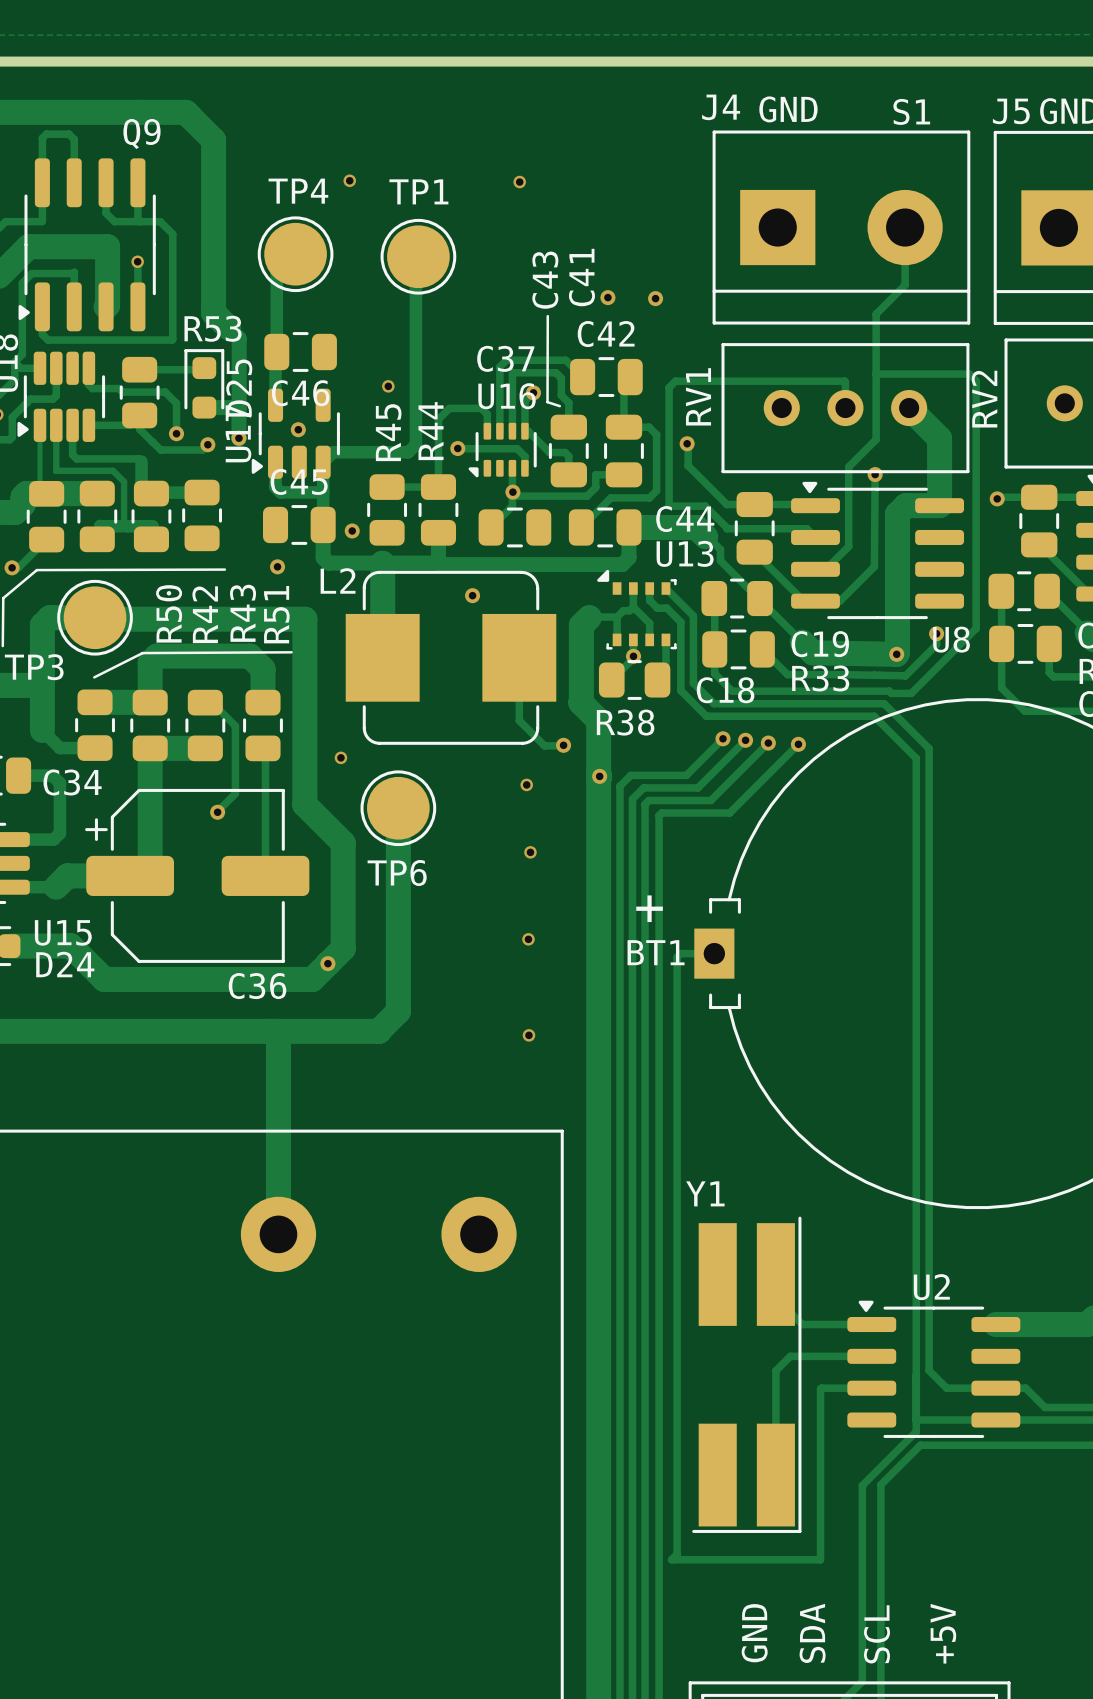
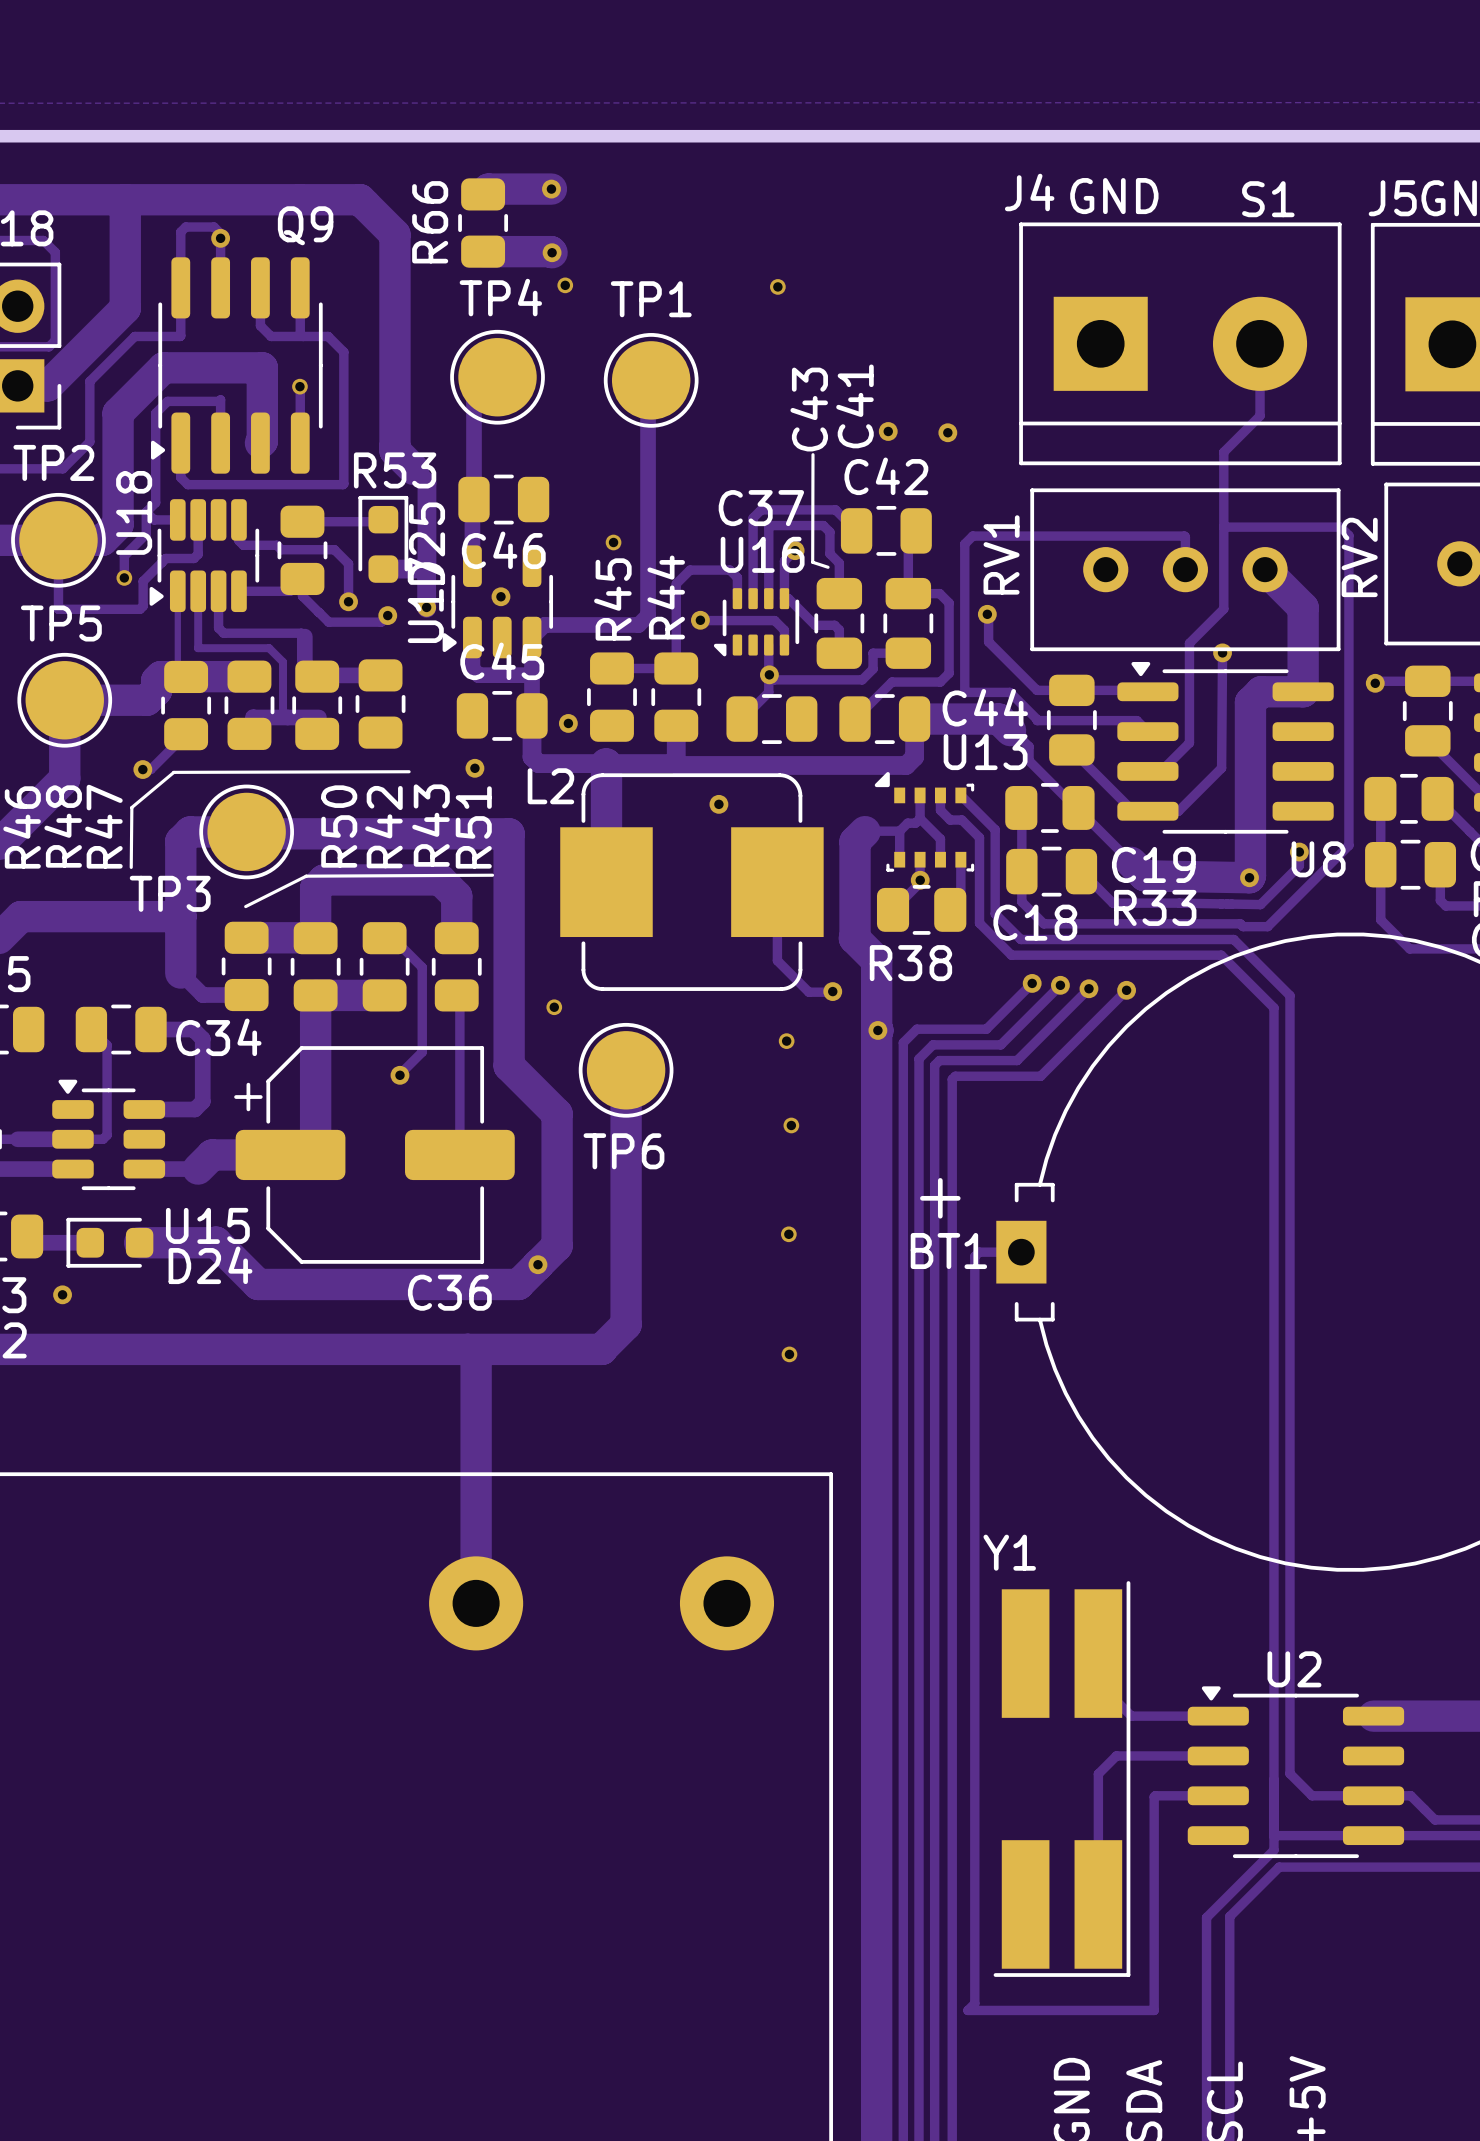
track: none -> (551, 189) (488, 189) (483, 194)
via: none -> (551, 189)
R66: none -> (483, 223)
via: none -> (220, 238)
track: none -> (483, 251) (552, 252)
via: none -> (552, 252)

